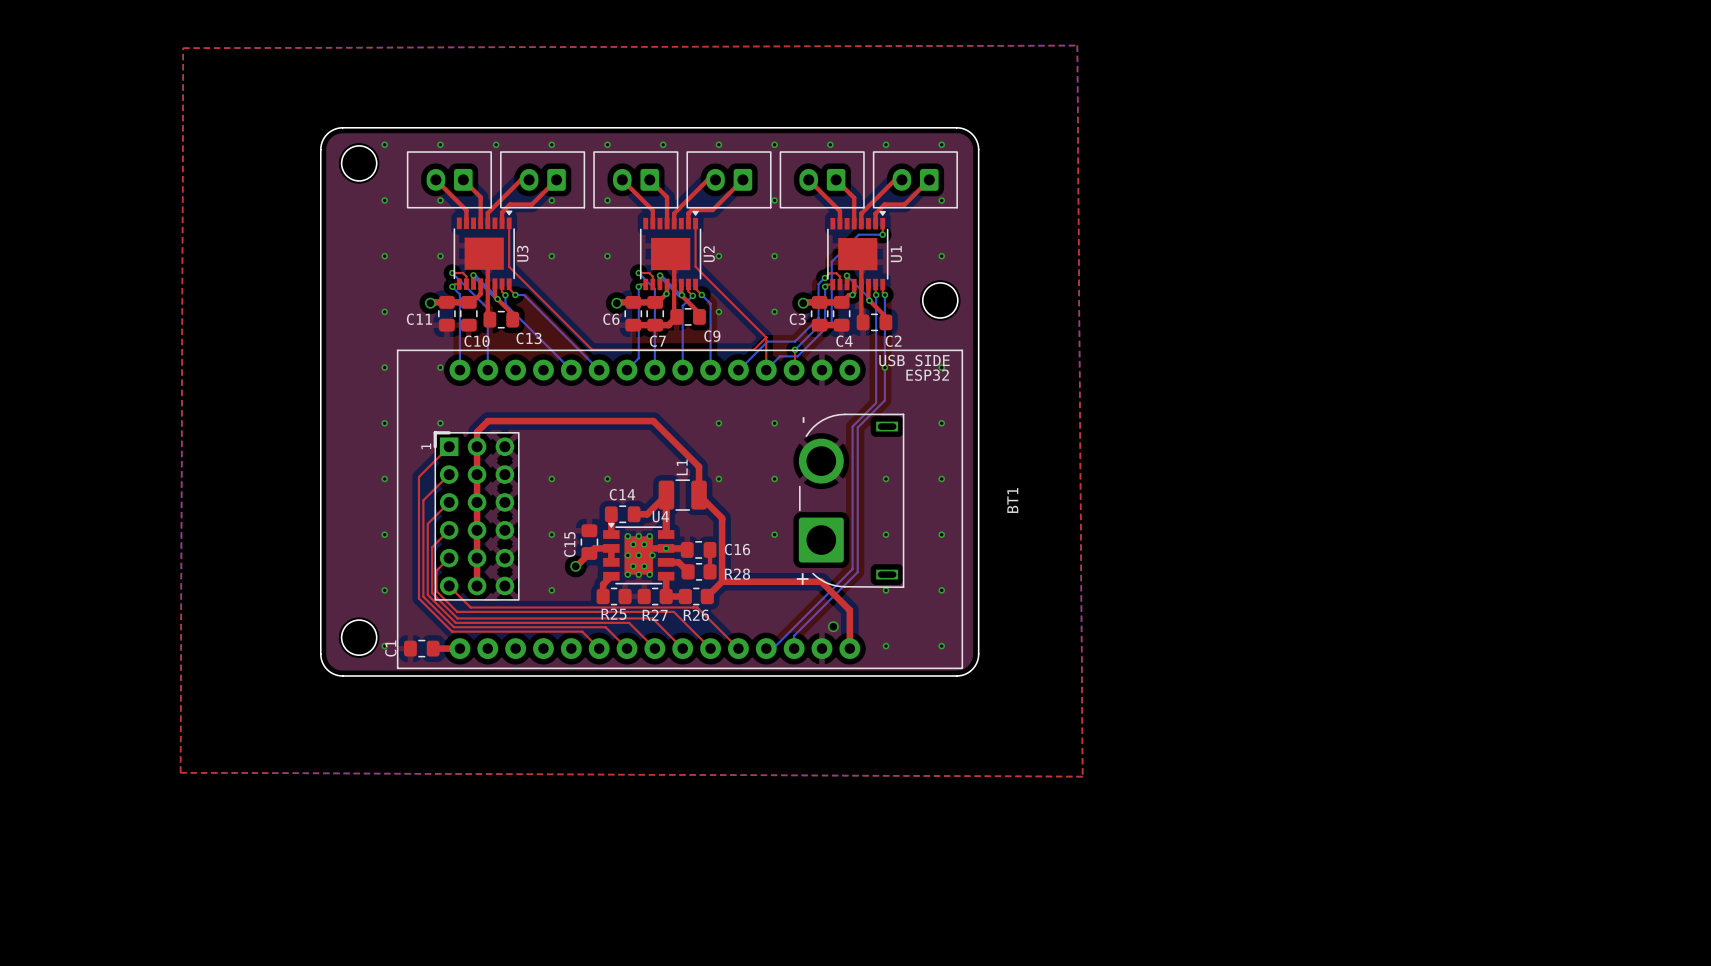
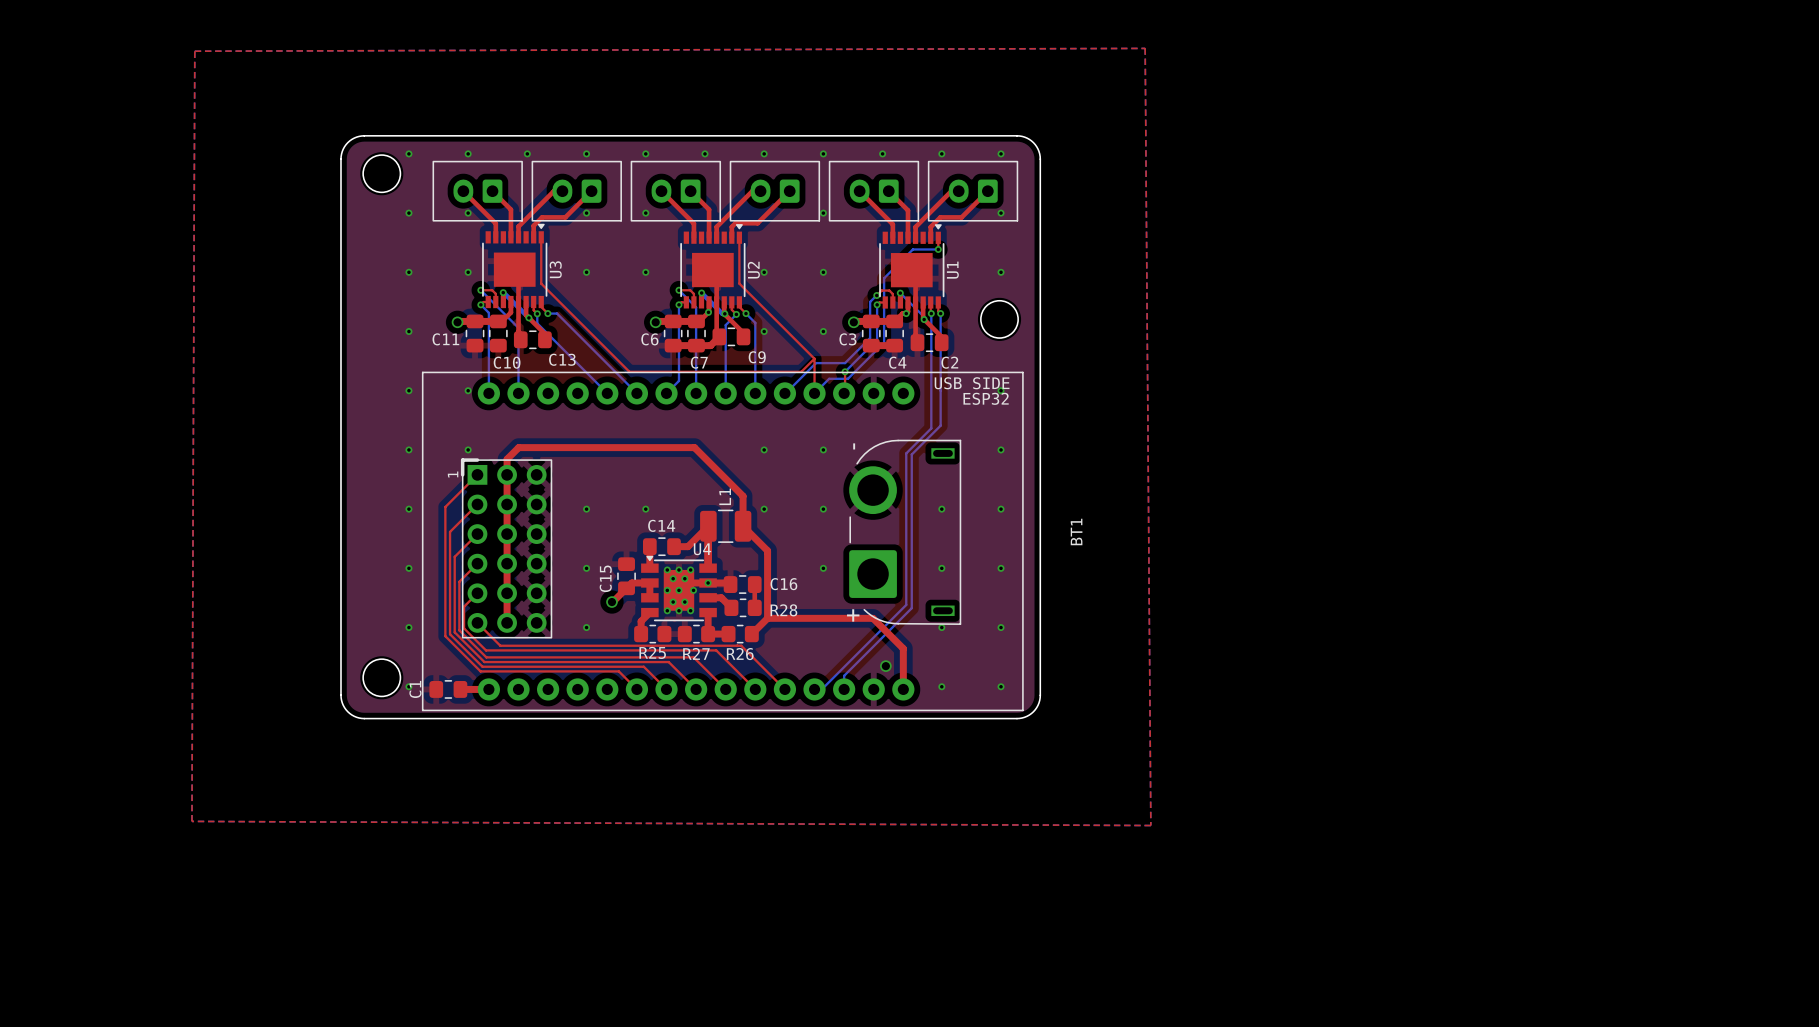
via: (884, 367) -> none

